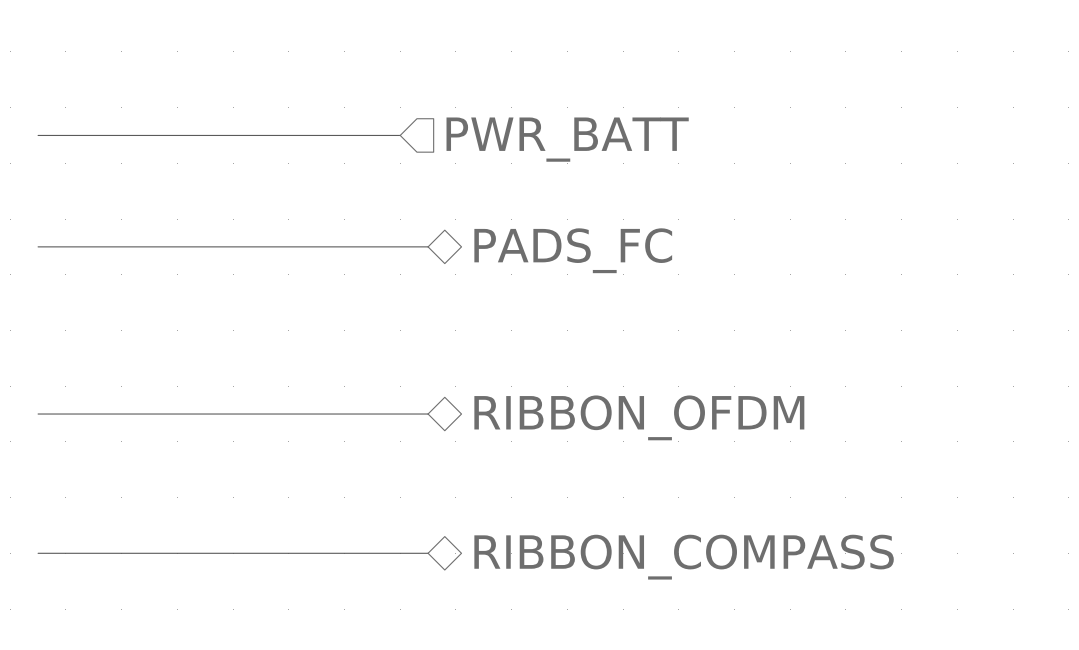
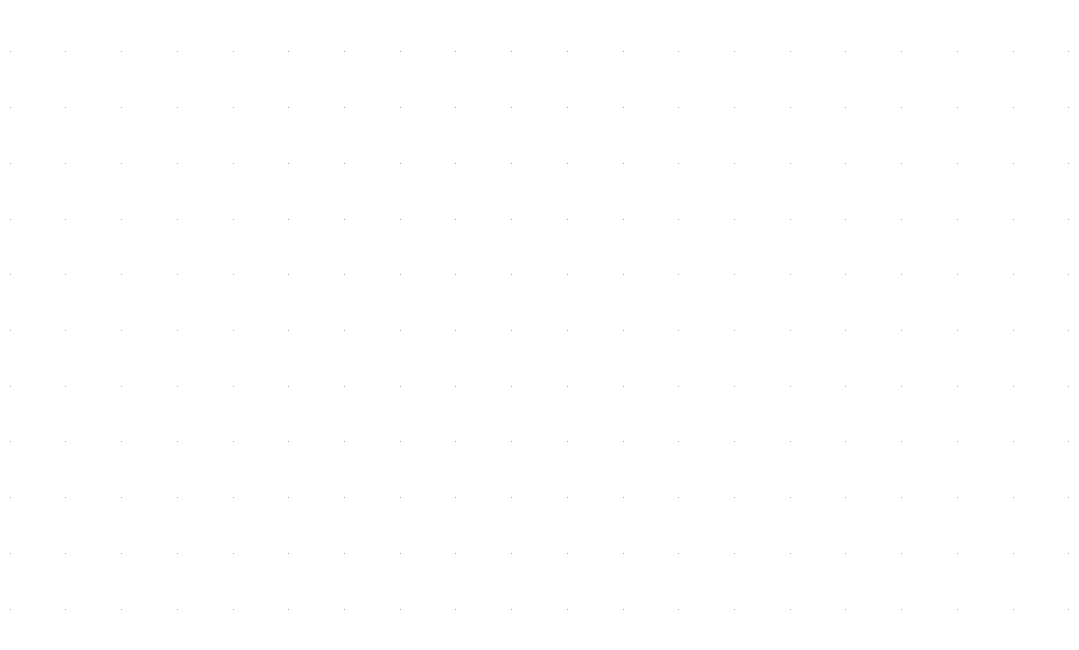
bus: (38, 135) (400, 135) -> none
hierarchical label: PWR_BATT (567, 139) -> none
bus: (38, 246) (428, 246) -> none
hierarchical label: PADS_FC (573, 250) -> none
bus: (38, 414) (428, 414) -> none
hierarchical label: RIBBON_OFDM (639, 417) -> none
bus: (38, 553) (428, 553) -> none
hierarchical label: RIBBON_COMPASS (684, 557) -> none

